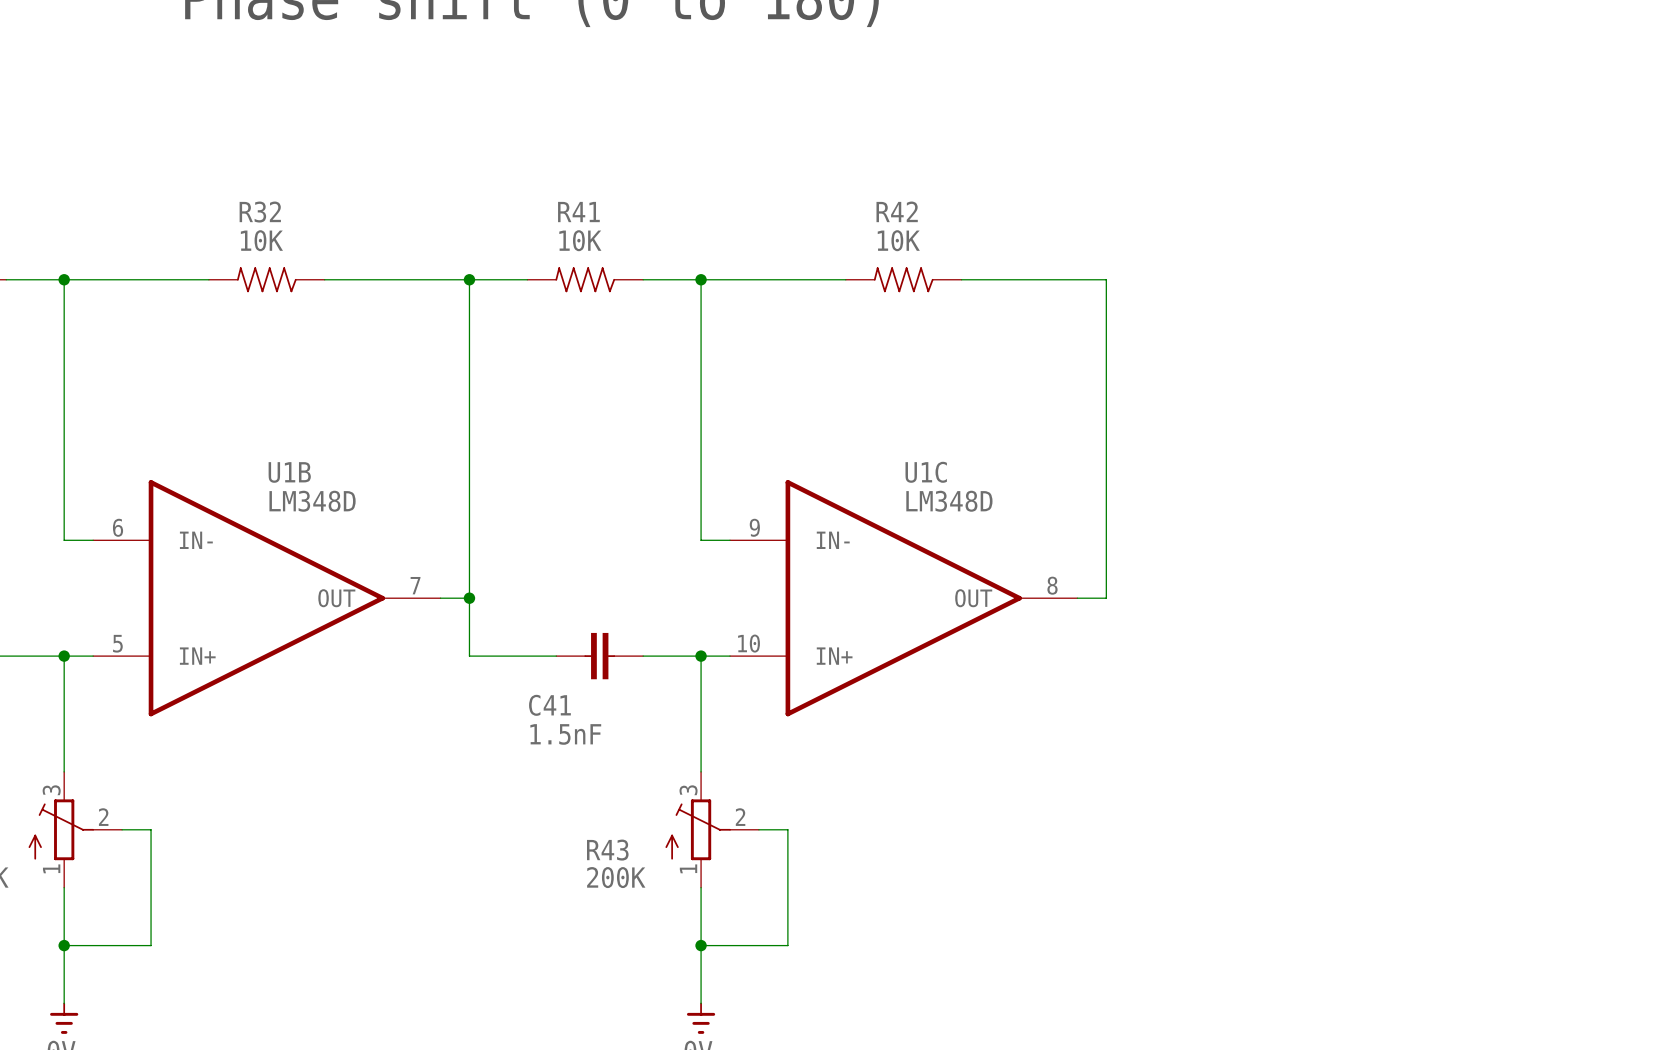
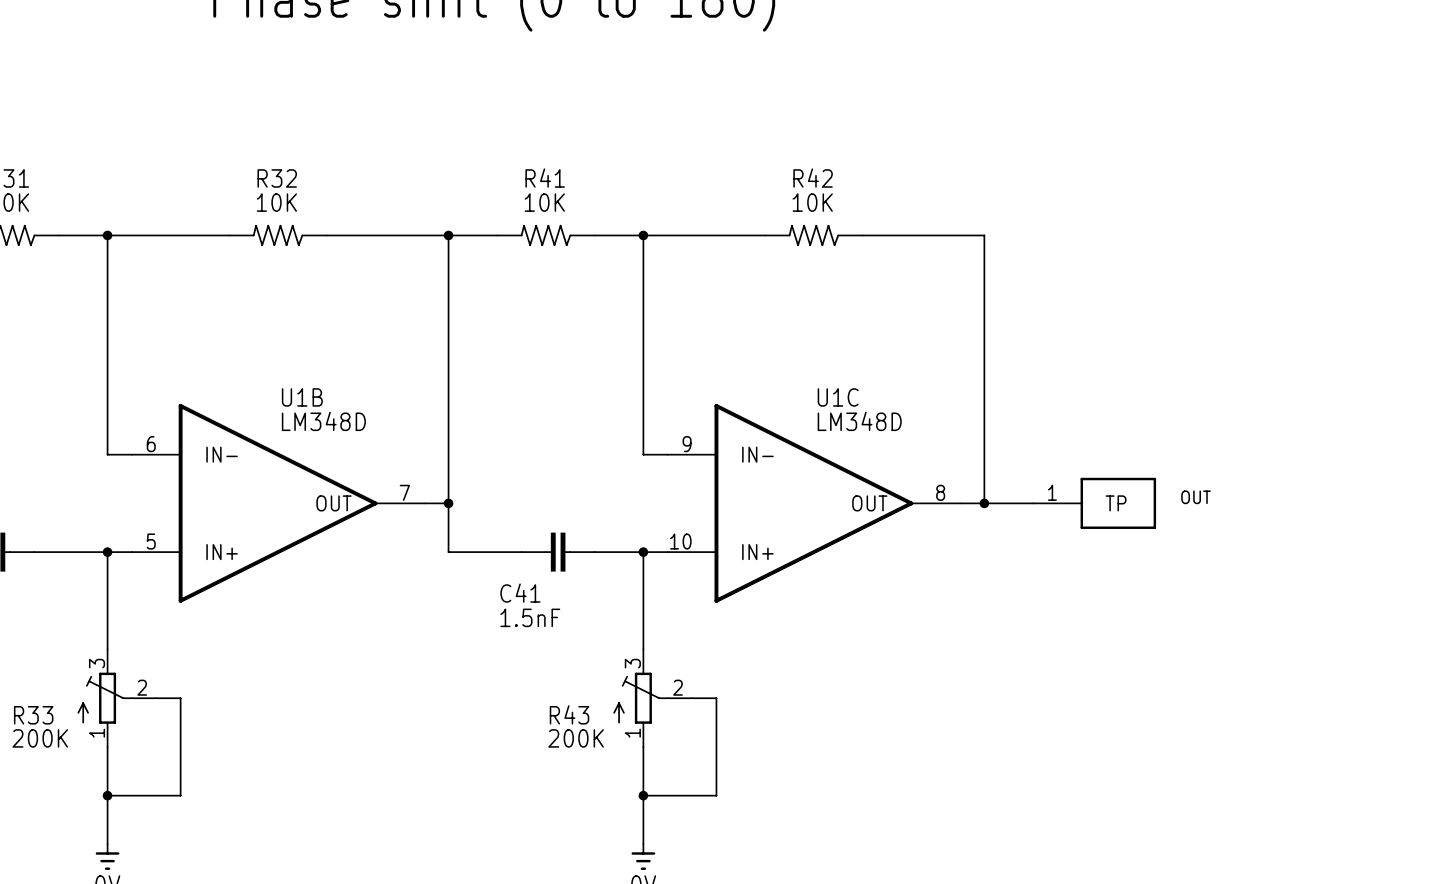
wire: none -> (984, 503) (1033, 503)
junction: none -> (984, 503)
OUT: none -> (1094, 503)

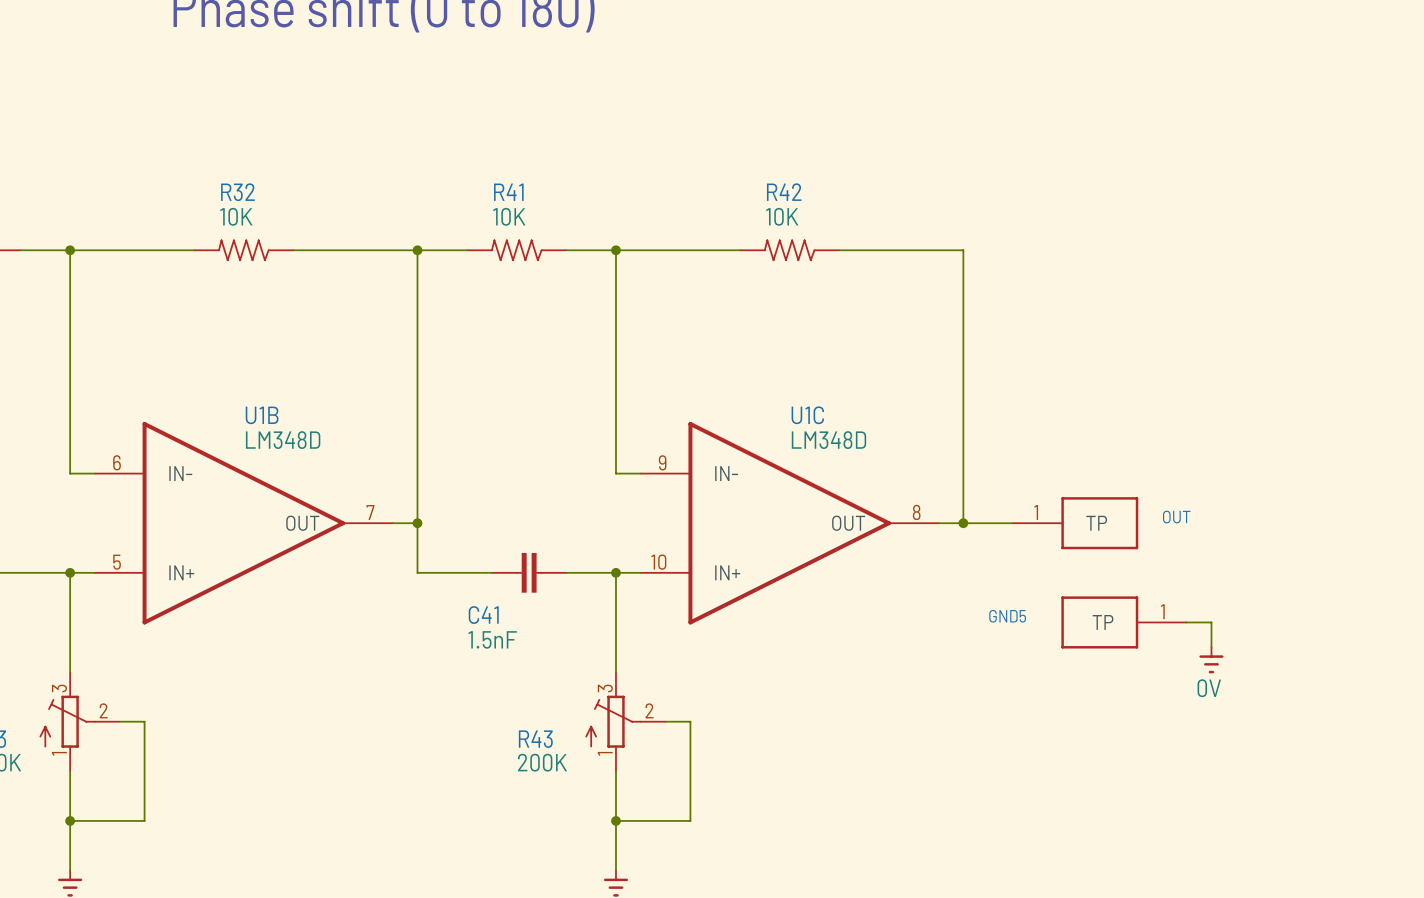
GND5: none -> (1124, 622)
wire: none -> (1186, 622) (1211, 622) (1211, 647)
power symbol: none -> 0V (1211, 659)

